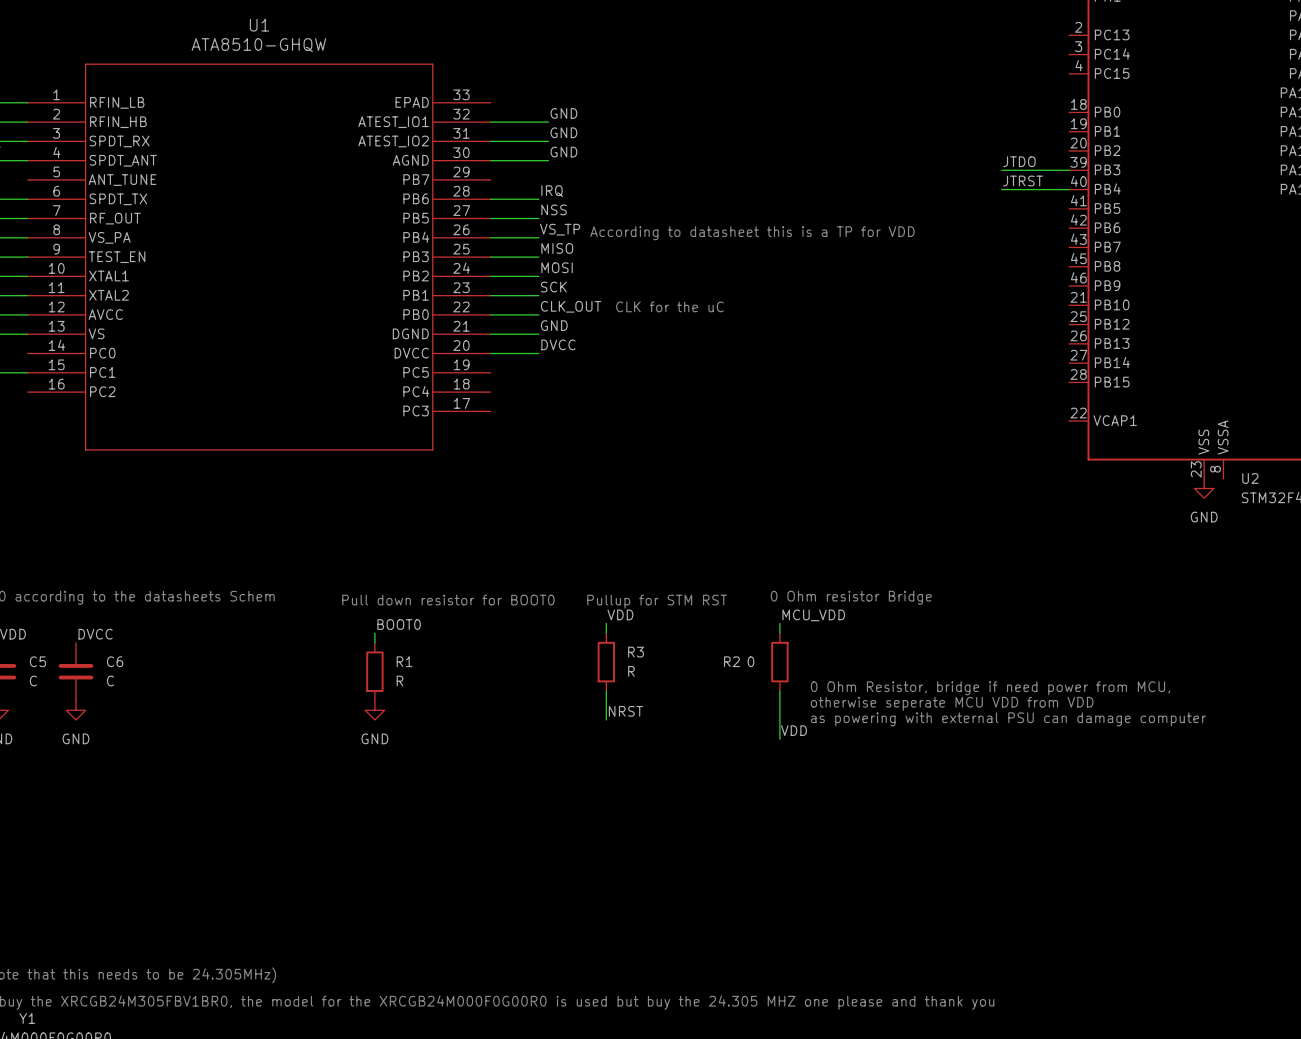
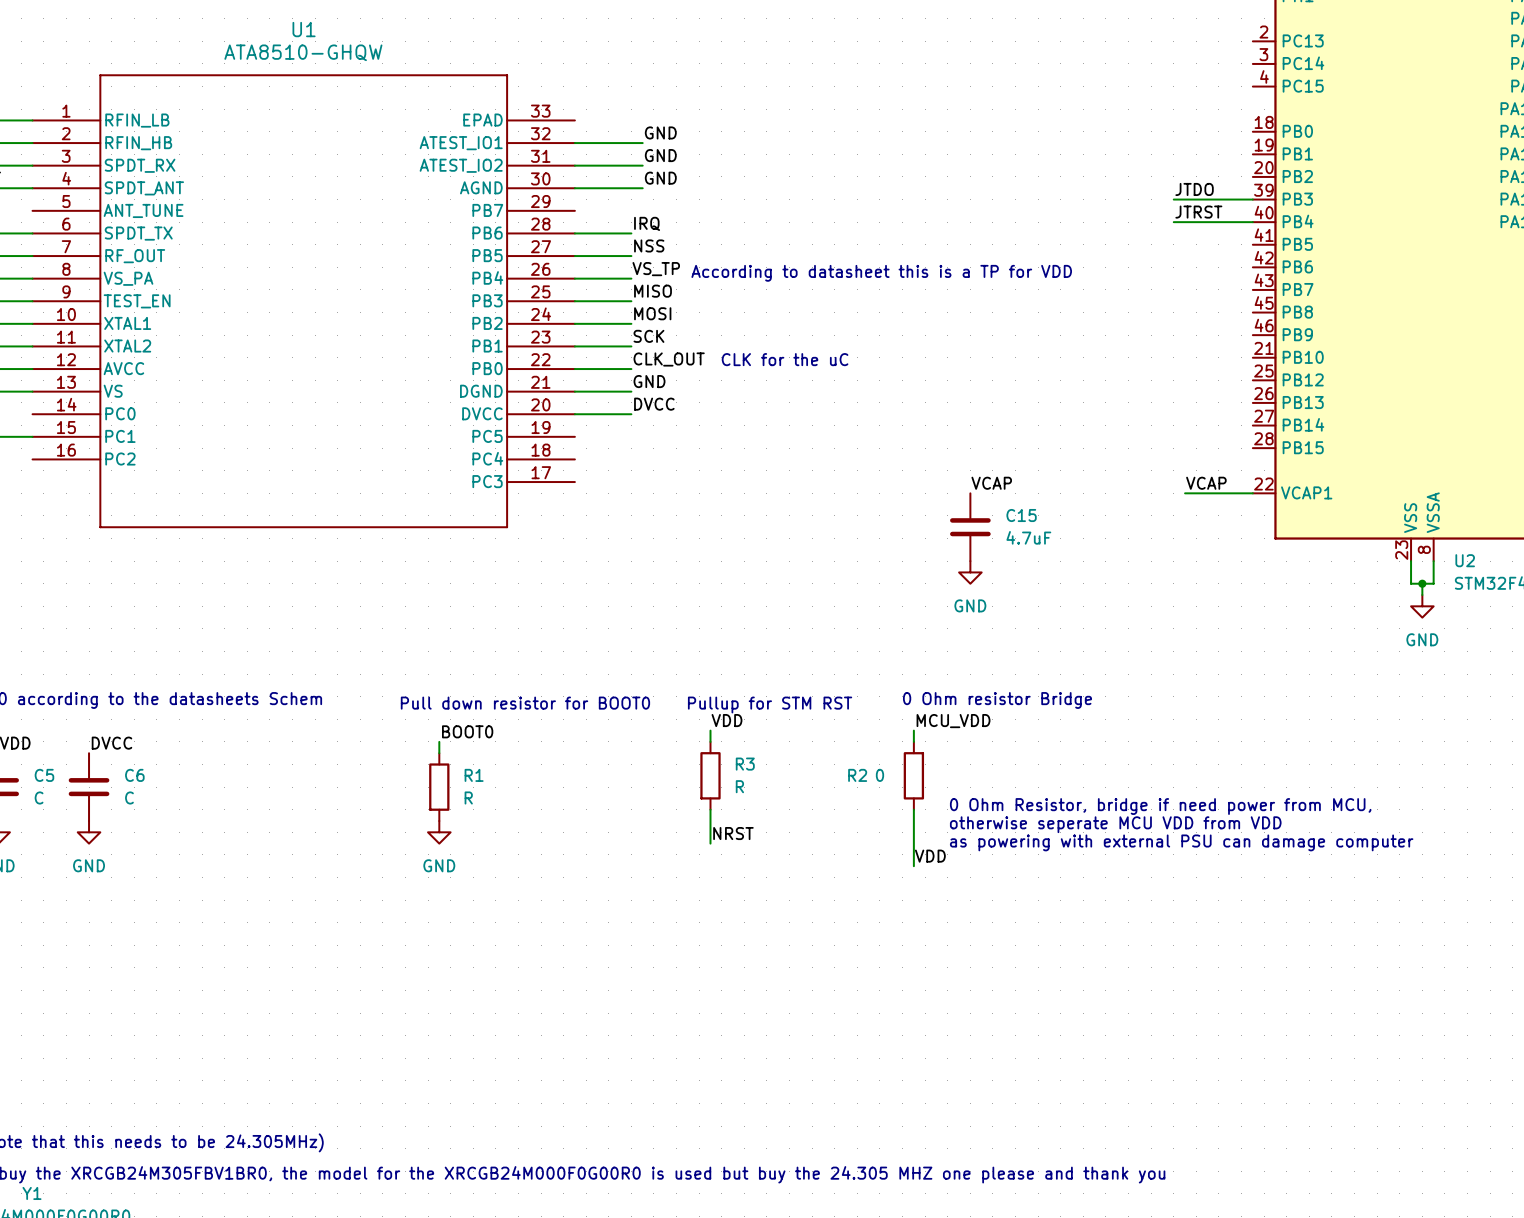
label: none -> VCAP (991, 483)
label: none -> VCAP (1206, 483)
wire: none -> (1185, 493) (1252, 493)
C15: none -> 4.7uF (970, 527)
wire: none -> (1411, 561) (1411, 583) (1433, 583) (1433, 561)
power symbol: none -> GND (970, 572)
power symbol position: GND (1204, 488) -> GND (1422, 606)
wire: none -> (1422, 583) (1422, 595)
junction: none -> (1422, 583)

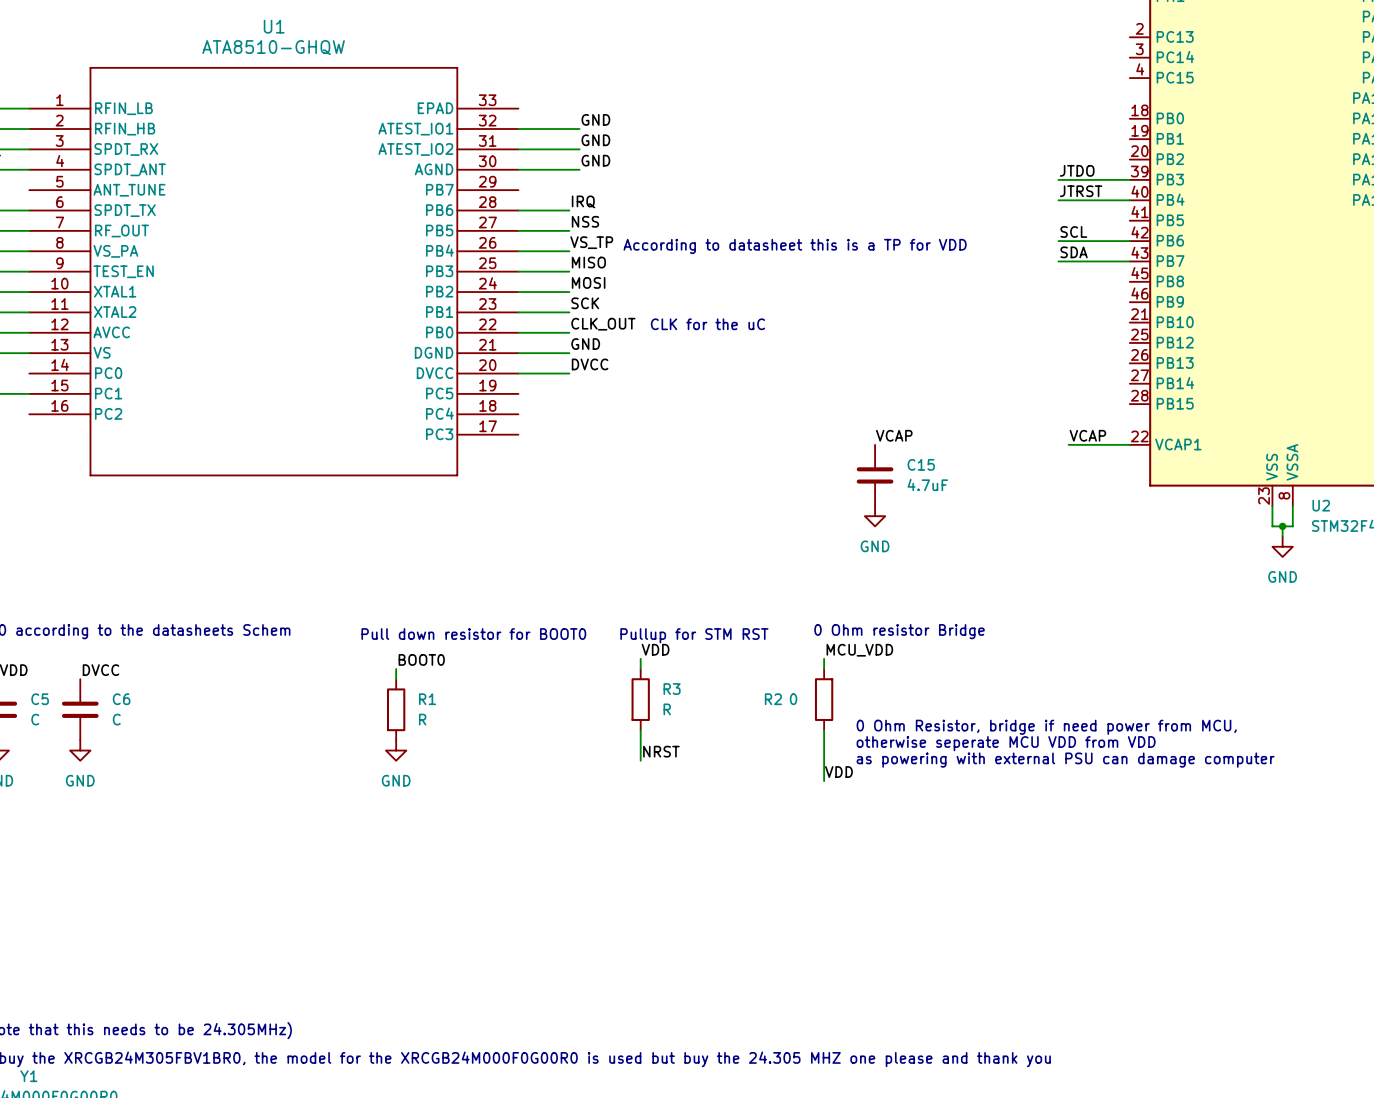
label: none -> SCL (1073, 231)
wire: none -> (1058, 241) (1129, 241)
label: none -> SDA (1074, 252)
wire: none -> (1058, 261) (1129, 261)

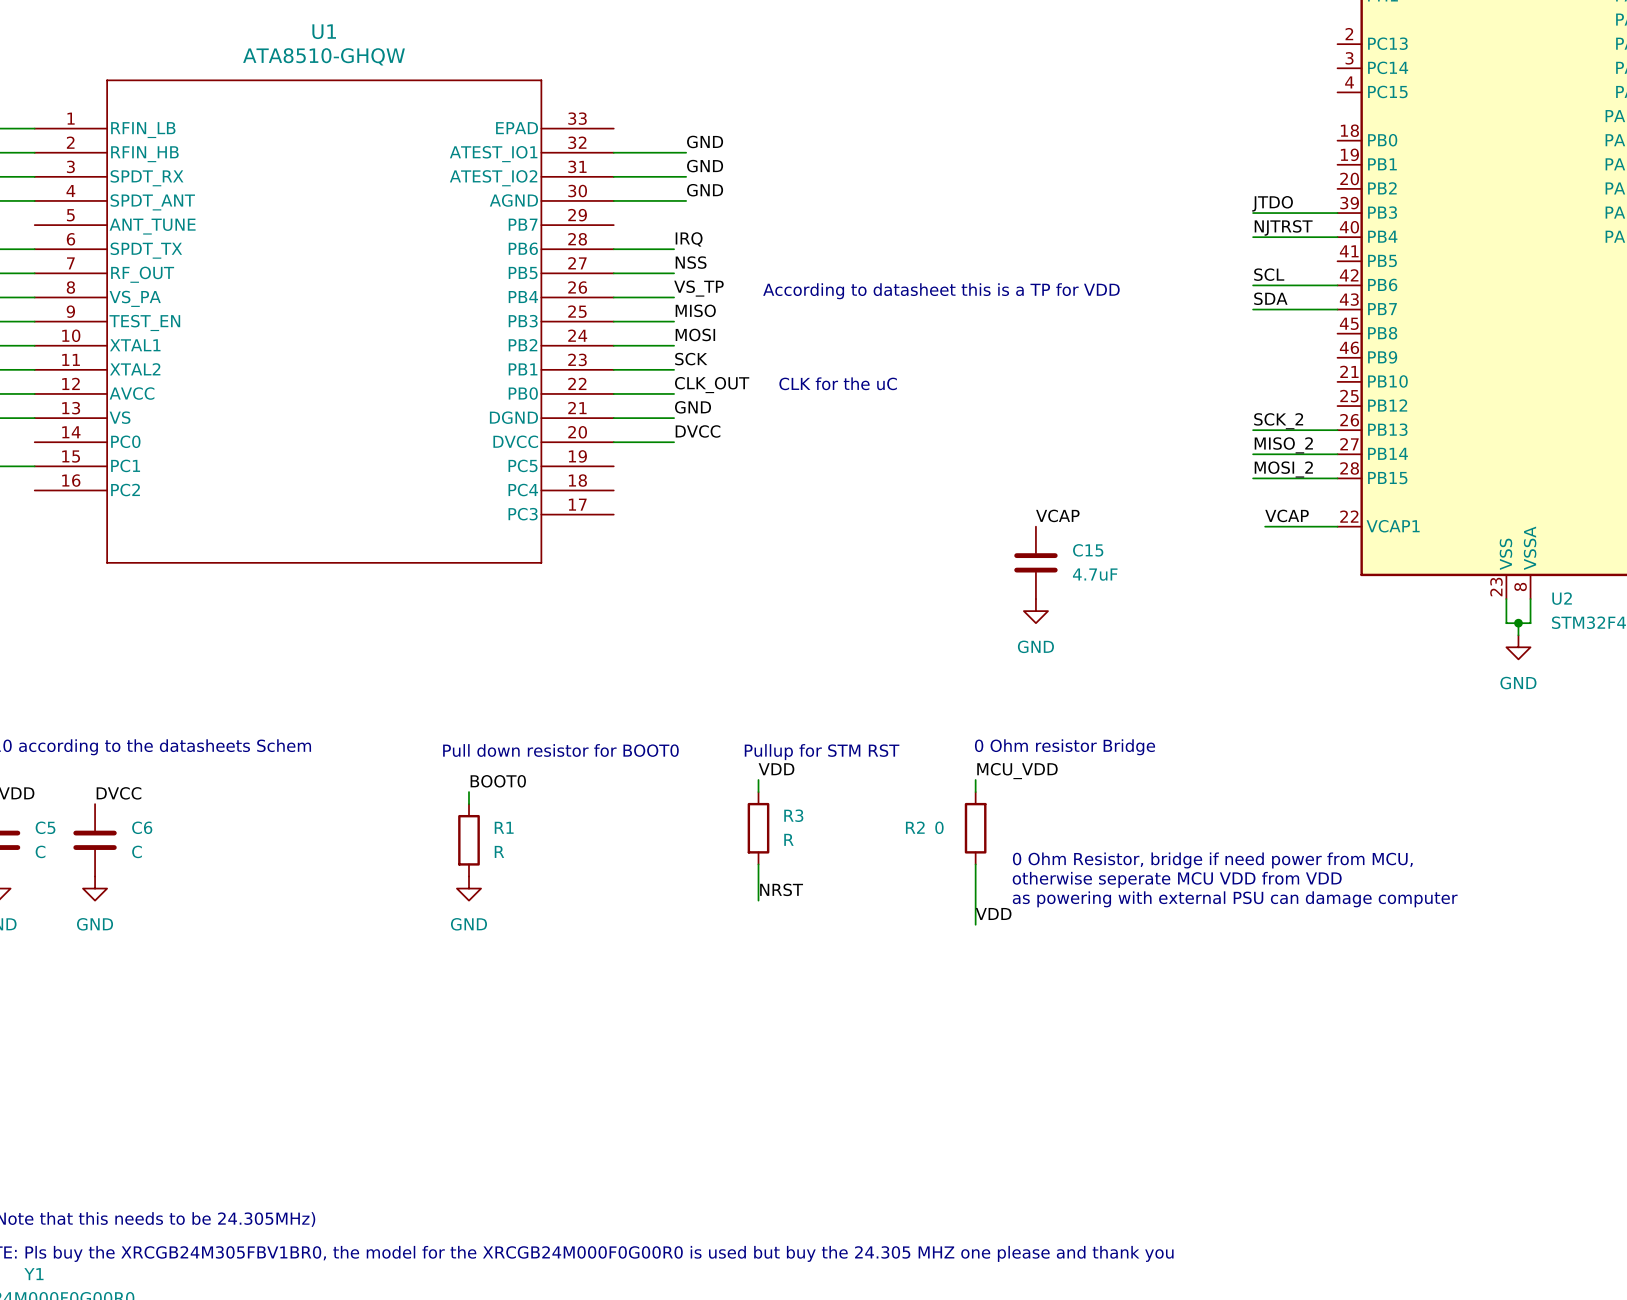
label: JTRST (1081, 191) -> NJTRST (1283, 227)
label: none -> SCK_2 (1278, 421)
wire: none -> (1253, 430) (1337, 430)
label: none -> MISO_2 (1283, 445)
wire: none -> (1253, 454) (1337, 454)
label: none -> MOSI_2 (1283, 469)
wire: none -> (1253, 478) (1337, 478)

